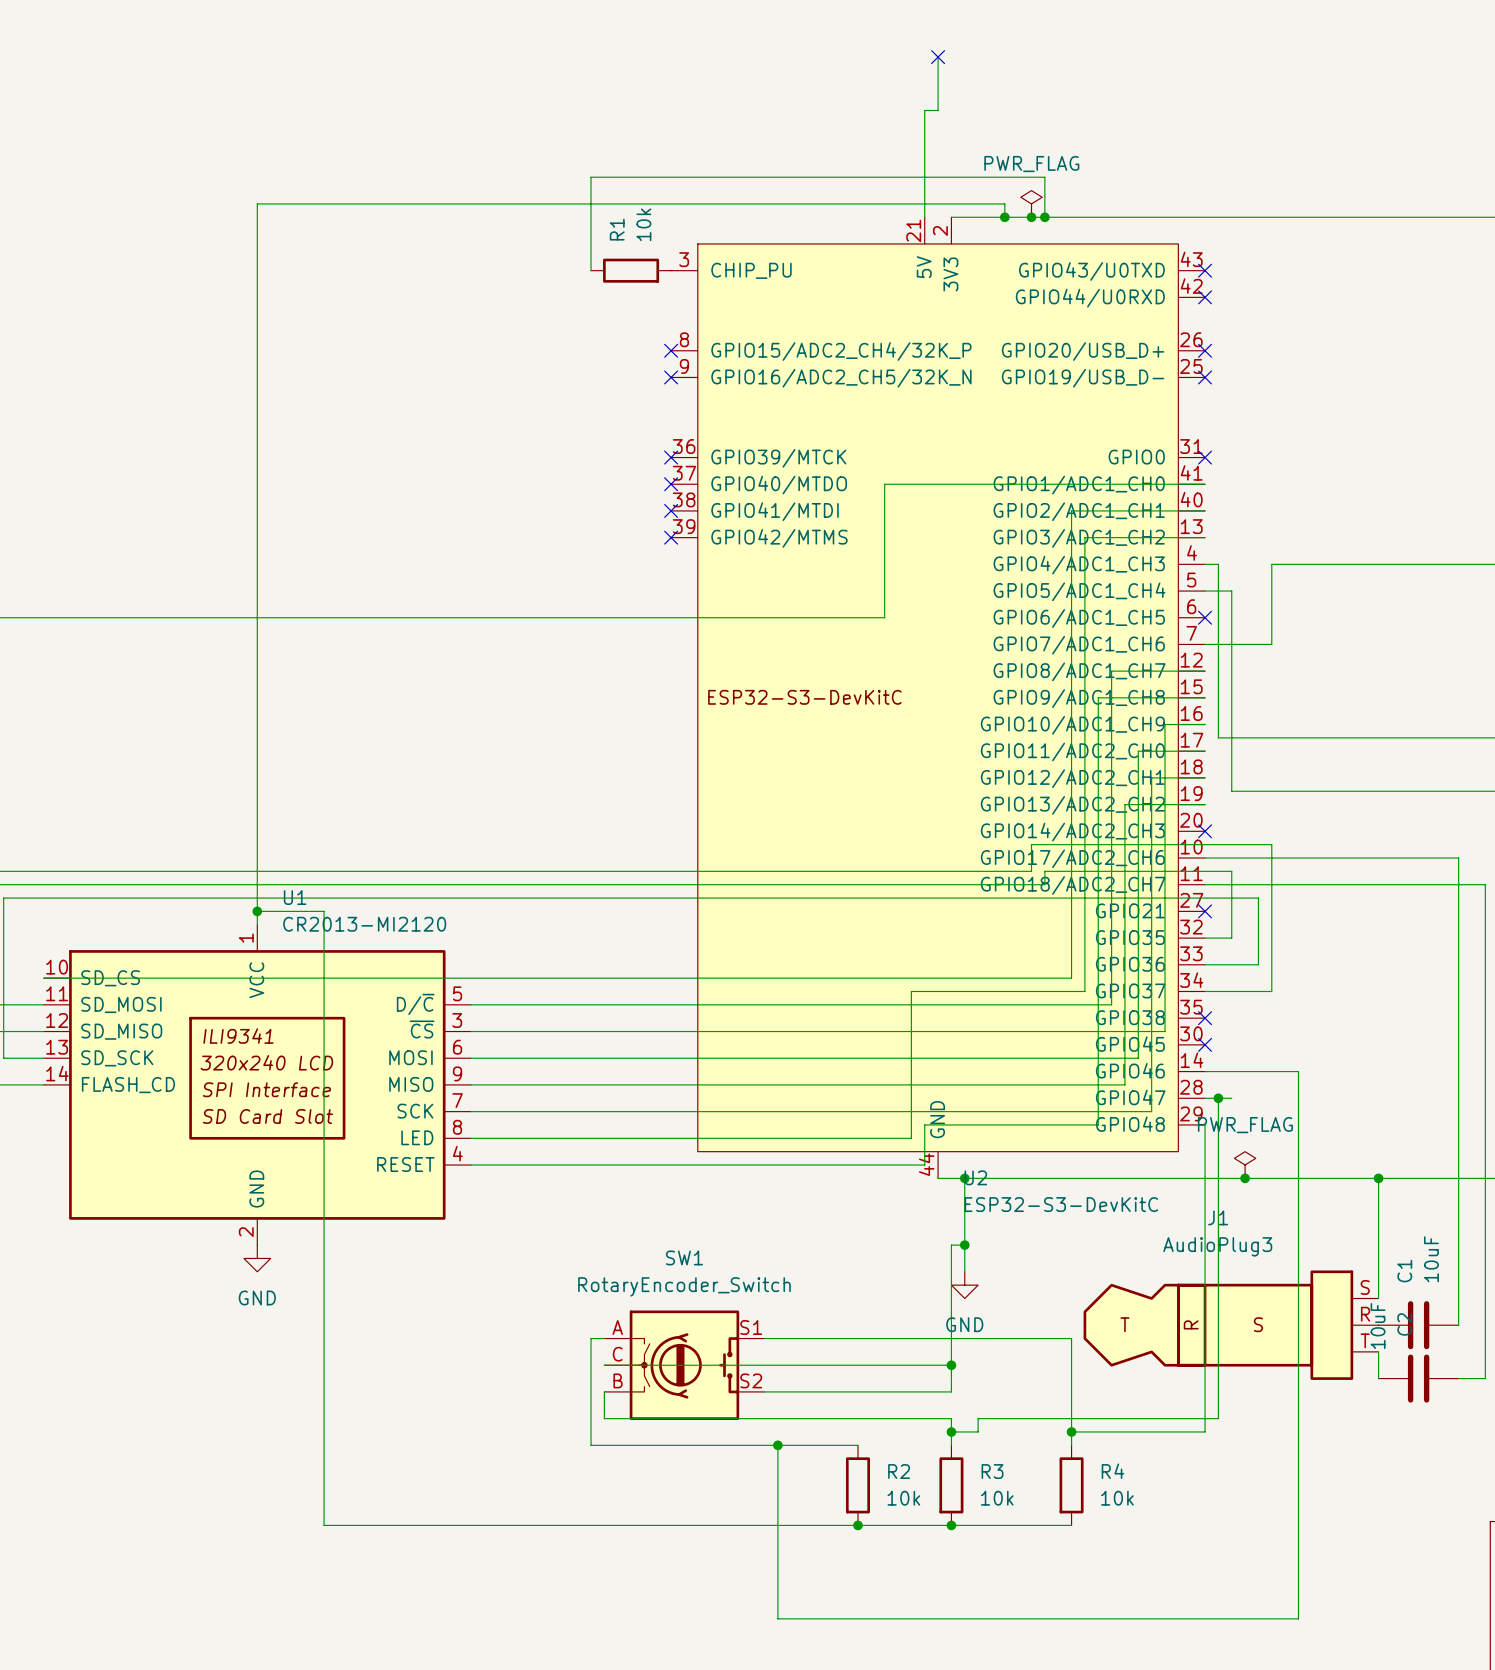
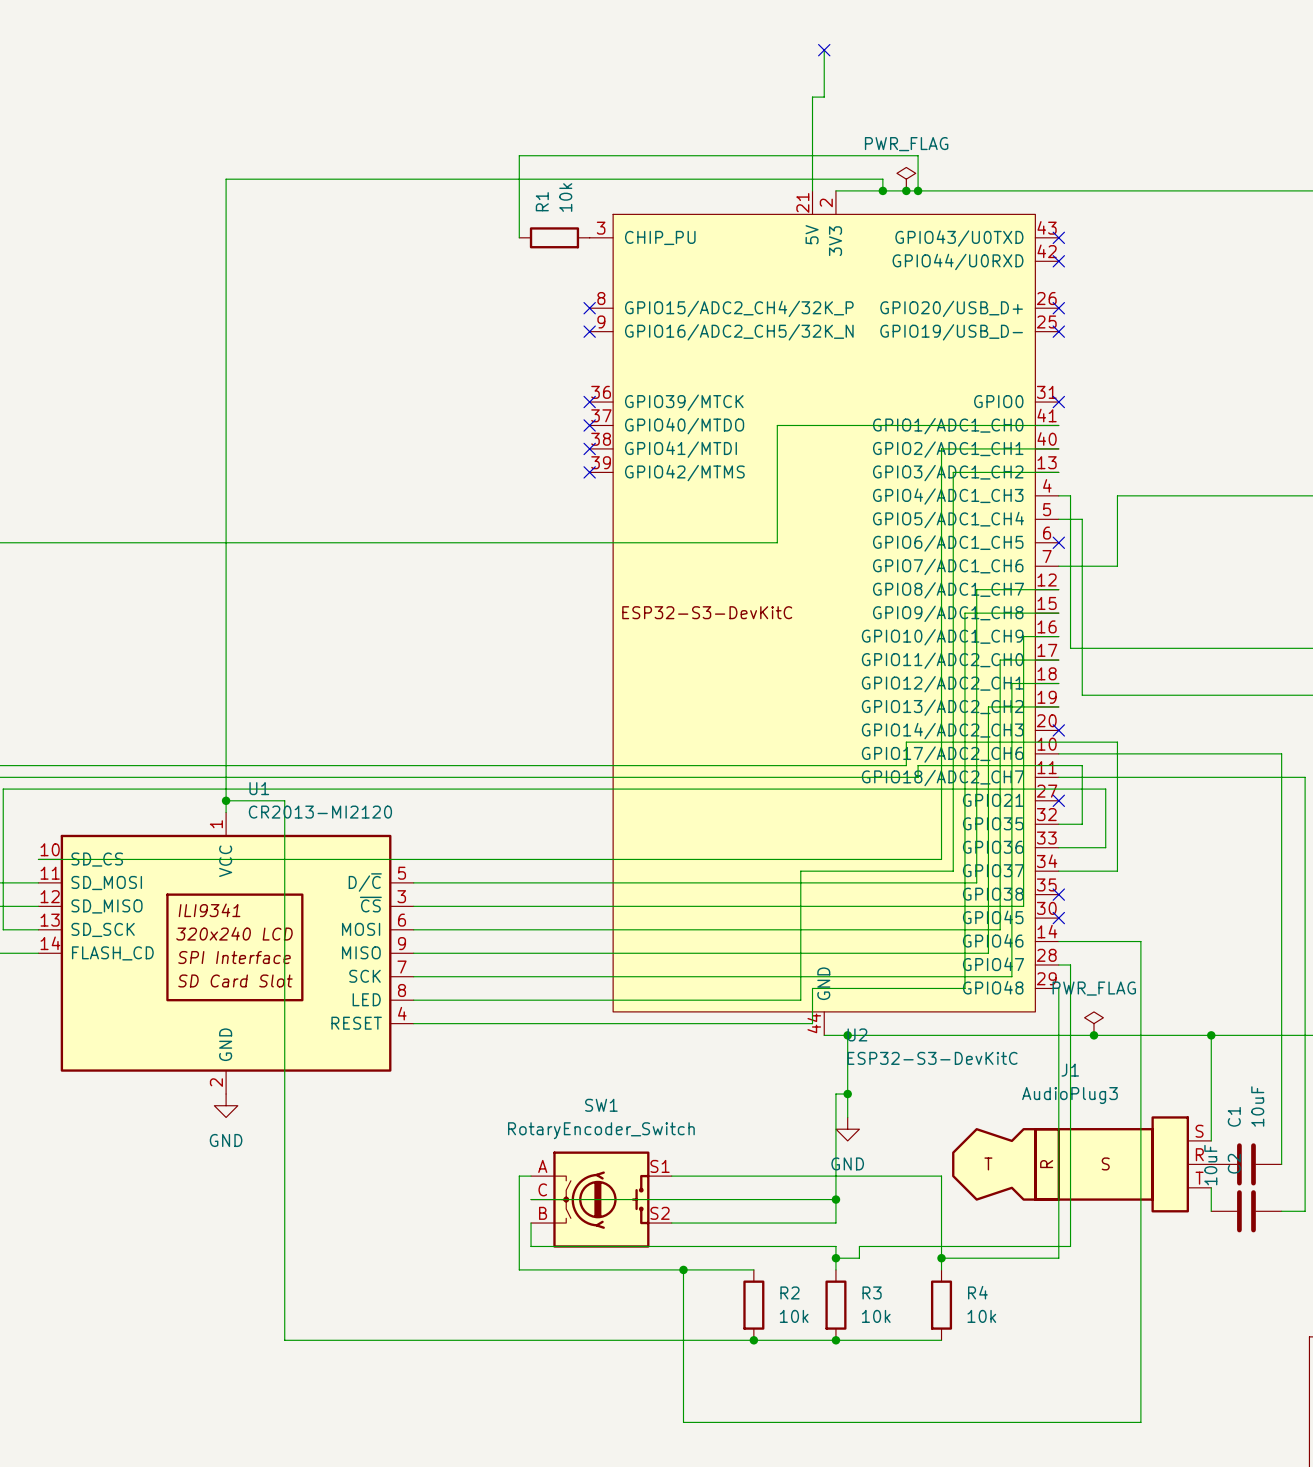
wire: (1218, 1098) (1231, 1098) -> none
junction: (1218, 1098) -> none

